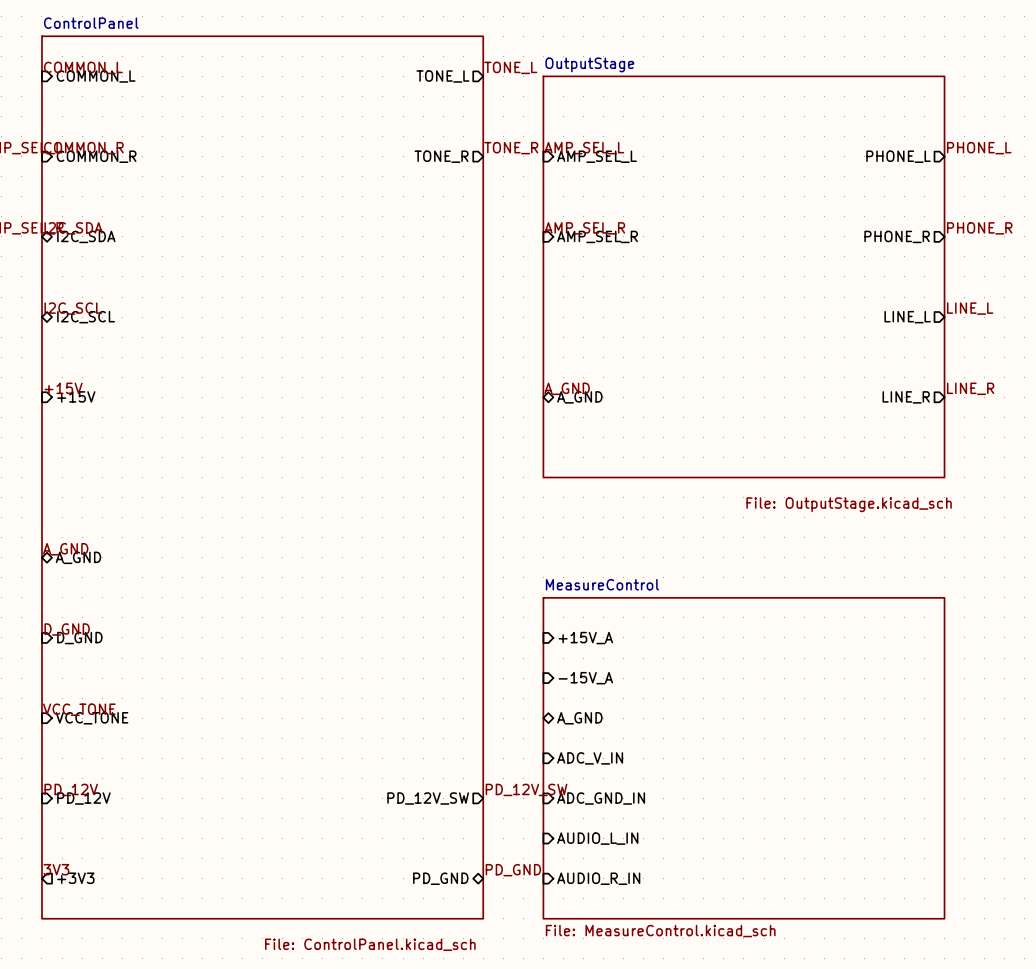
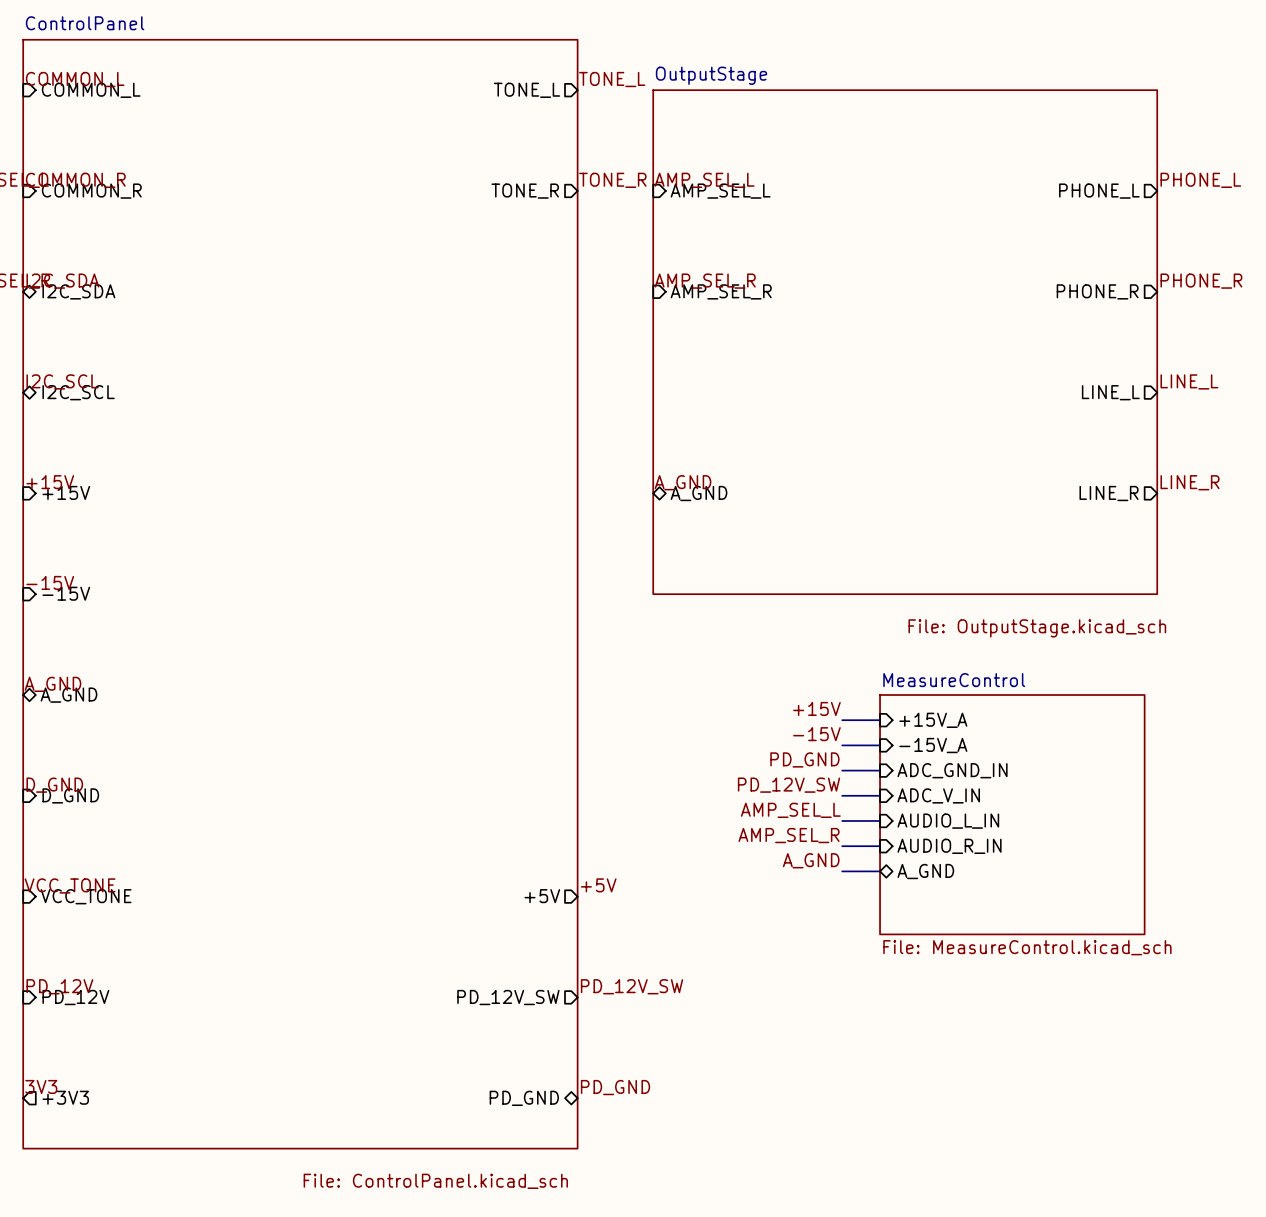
label: none -> -15V (50, 582)
sheet pin: none -> -15V (66, 593)
label: none -> +15V (816, 708)
wire: none -> (842, 720) (880, 720)
label: none -> -15V (816, 734)
sheet pin: none -> -15V_A (933, 745)
label: none -> PD_GND (804, 759)
wire: none -> (842, 770) (880, 770)
sheet pin: none -> ADC_GND_IN (952, 770)
label: none -> PD_12V_SW (789, 785)
wire: none -> (842, 795) (880, 795)
sheet pin position: +15V_A (585, 638) -> +15V_A (933, 720)
sheet pin: none -> ADC_V_IN (938, 795)
label: none -> AMP_SEL_L (790, 810)
sheet MeasureControl: none -> File: MeasureControl.kicad_sch (1012, 814)
wire: none -> (842, 821) (880, 821)
sheet pin: none -> AUDIO_L_IN (948, 821)
label: none -> AMP_SEL_R (789, 835)
sheet pin: -15V_A (585, 678) -> none
wire: none -> (842, 846) (880, 846)
sheet pin: none -> AUDIO_R_IN (949, 846)
label: none -> A_GND (811, 860)
wire: none -> (842, 871) (880, 871)
label: none -> +5V (598, 885)
sheet pin: none -> +5V (542, 896)
sheet pin position: A_GND (579, 718) -> A_GND (925, 871)
sheet pin: ADC_V_IN (590, 758) -> none
sheet MeasureControl: File: MeasureControl.kicad_sch (743, 758) -> none
sheet pin: ADC_GND_IN (601, 798) -> none
sheet pin: AUDIO_L_IN (597, 838) -> none
sheet pin: AUDIO_R_IN (598, 878) -> none

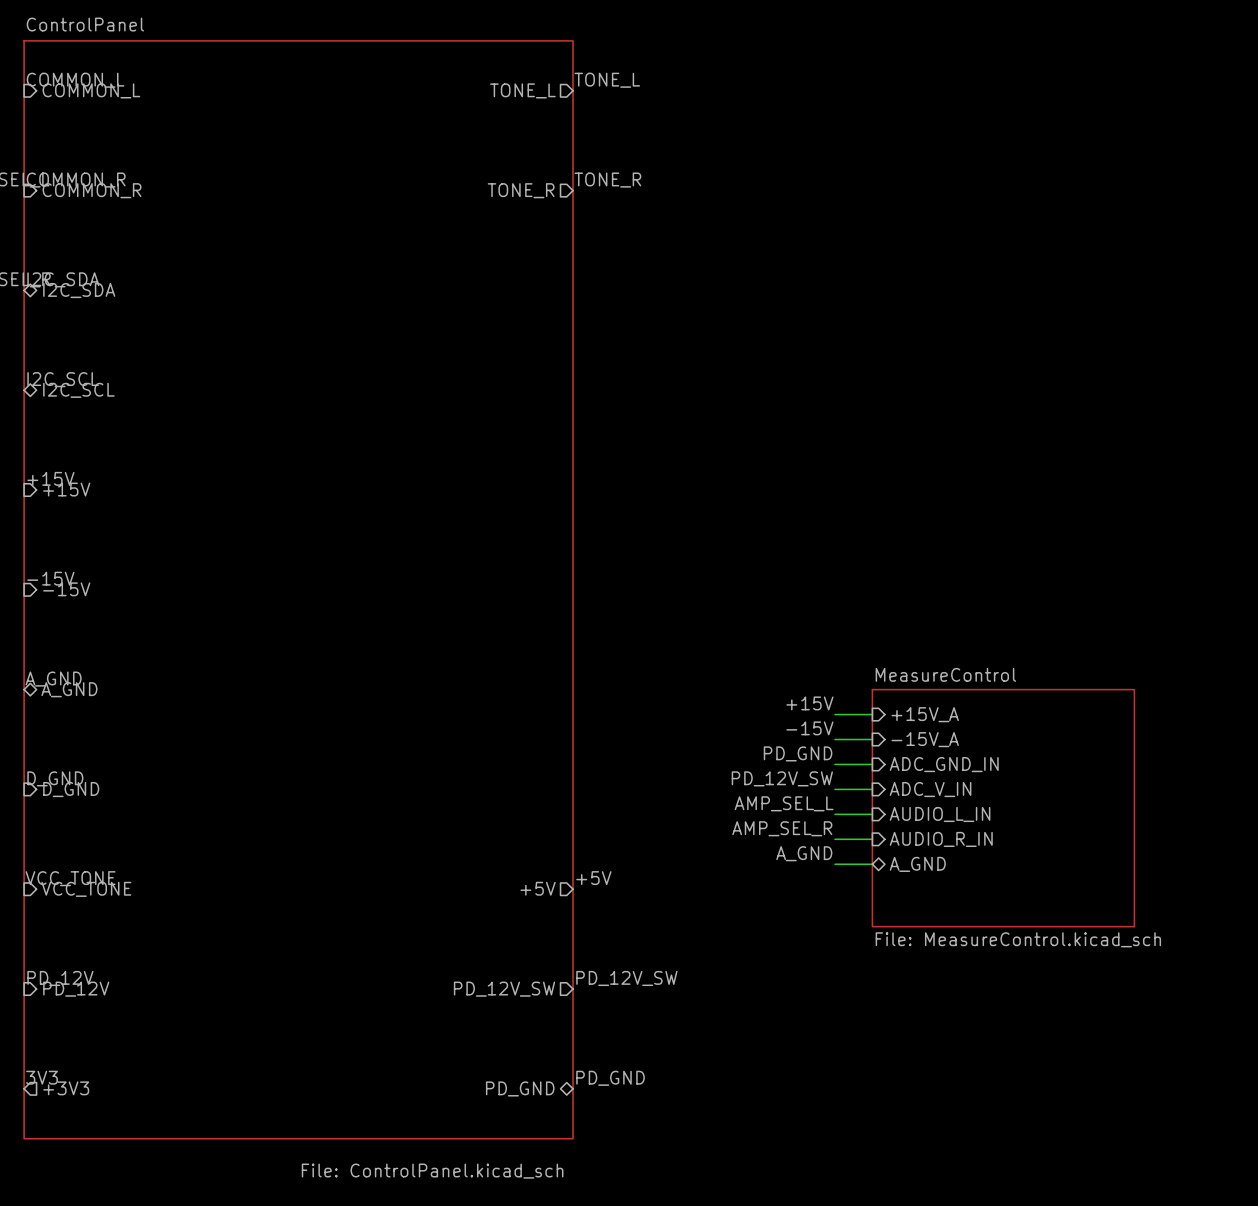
label: AMP_SEL_L (704, 180) -> none
label: PHONE_L (1200, 180) -> none
sheet pin: AMP_SEL_L (720, 191) -> none
sheet pin: PHONE_L (1099, 191) -> none
label: AMP_SEL_R (705, 281) -> none
label: PHONE_R (1201, 281) -> none
sheet pin: AMP_SEL_R (721, 291) -> none
sheet pin: PHONE_R (1097, 291) -> none
sheet OutputStage: File: OutputStage.kicad_sch (905, 342) -> none
label: LINE_L (1189, 381) -> none
sheet pin: LINE_L (1110, 392) -> none
label: A_GND (683, 482) -> none
label: LINE_R (1190, 482) -> none
sheet pin: A_GND (699, 493) -> none
sheet pin: LINE_R (1109, 493) -> none

